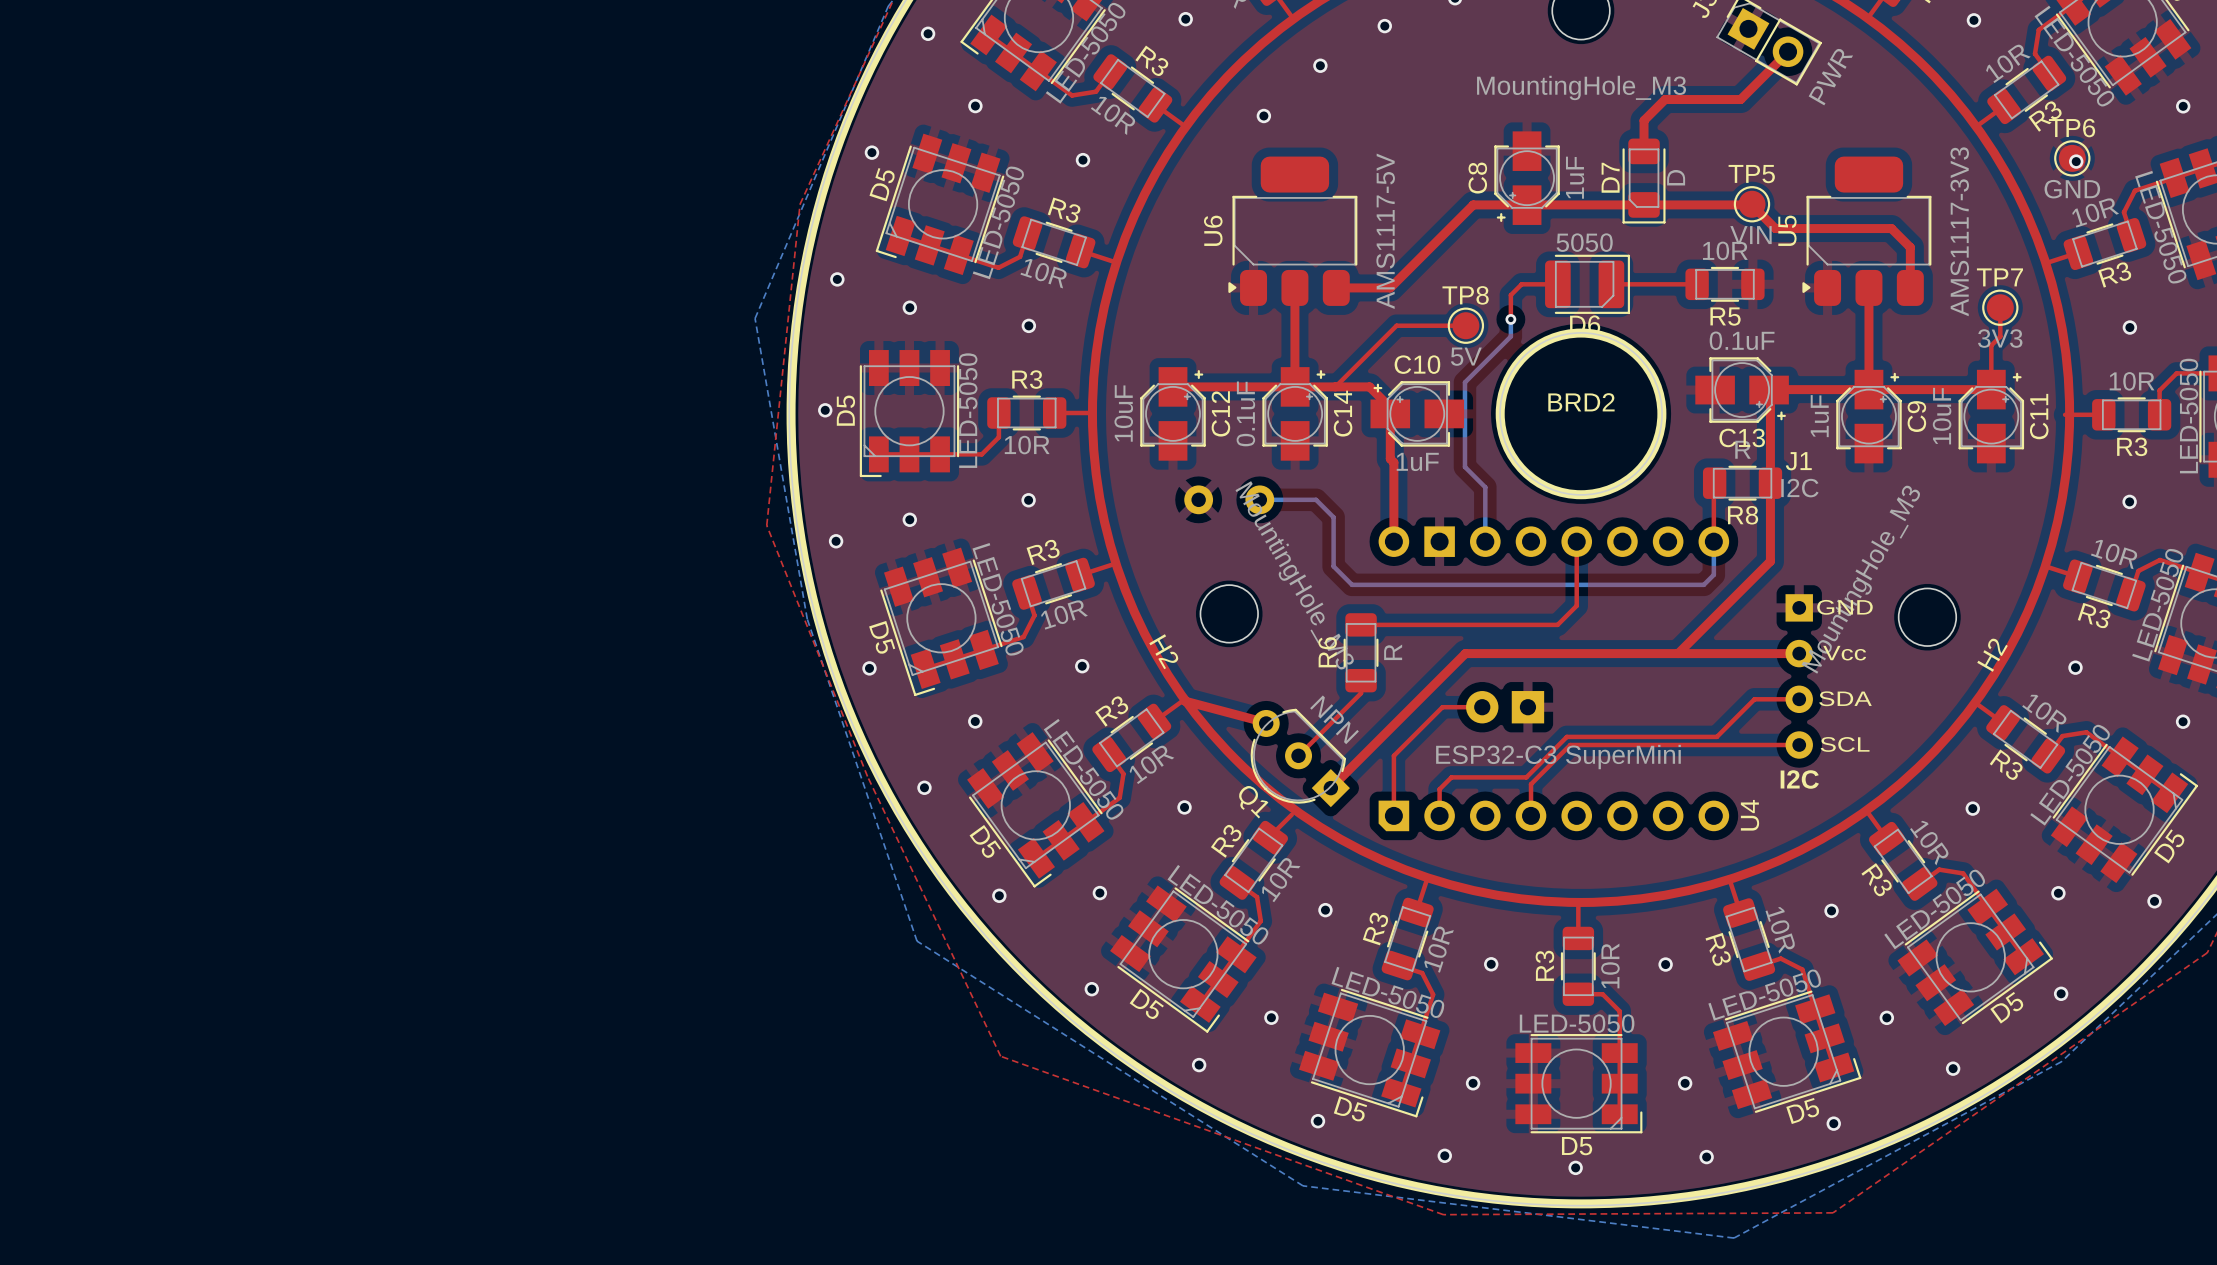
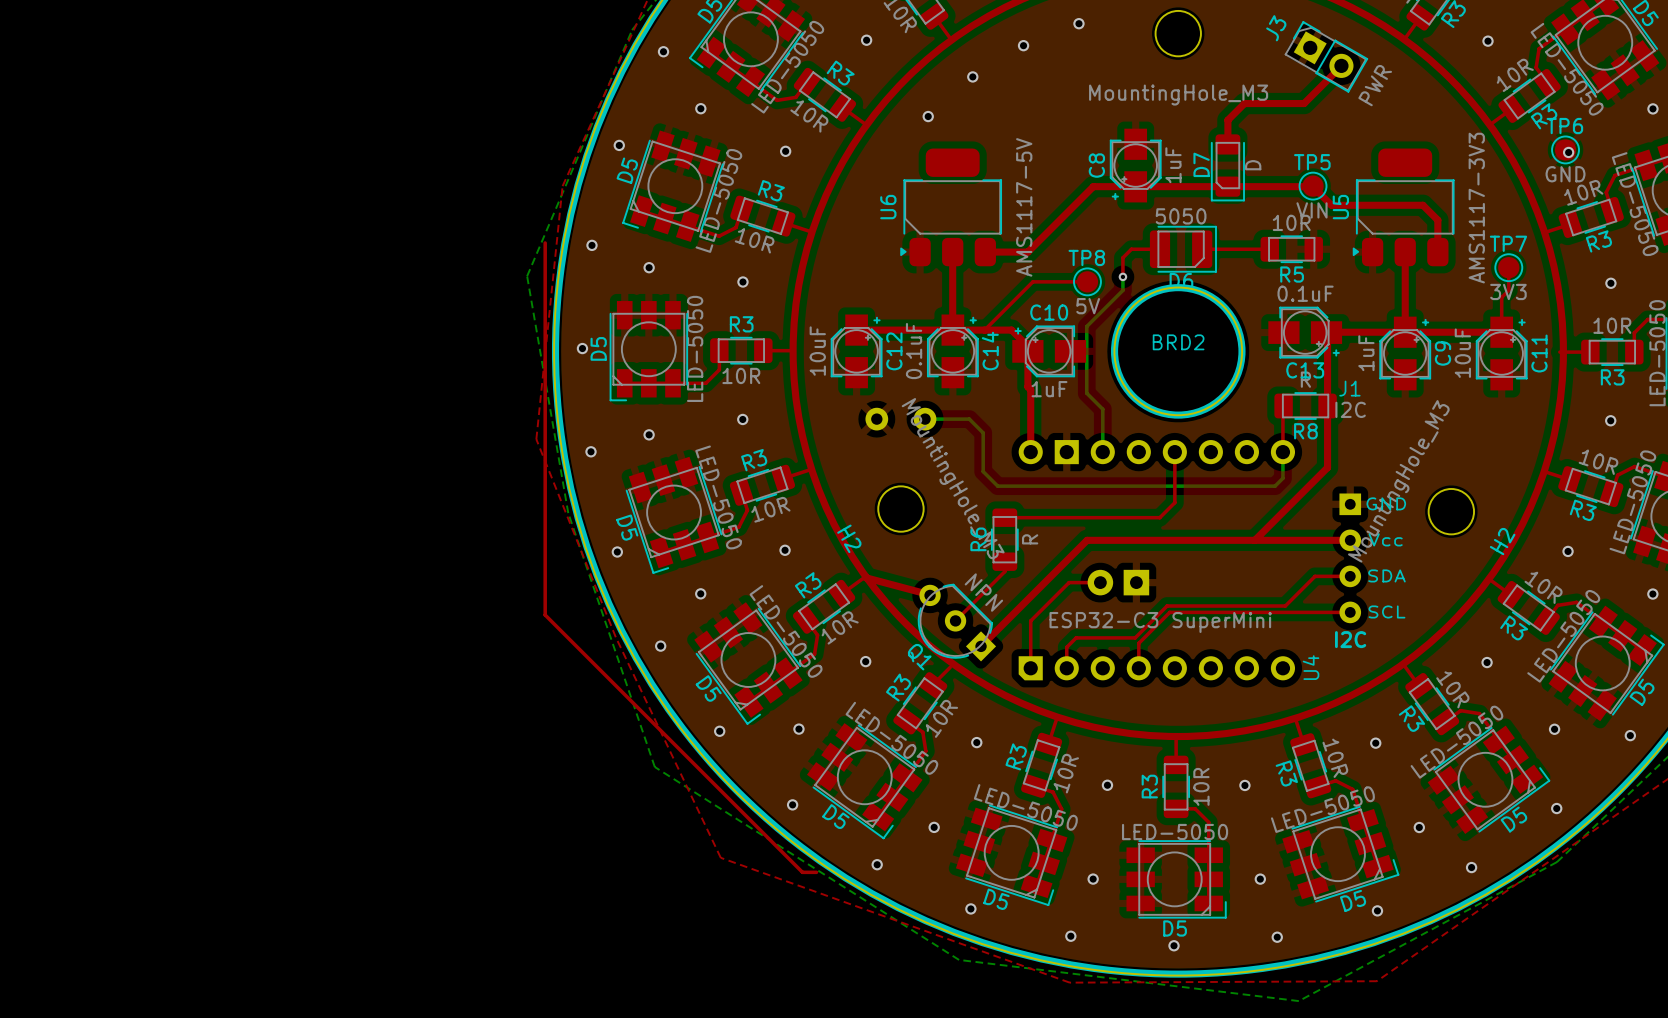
top track: none -> (545, 243) (545, 615) (802, 872) (816, 872)

